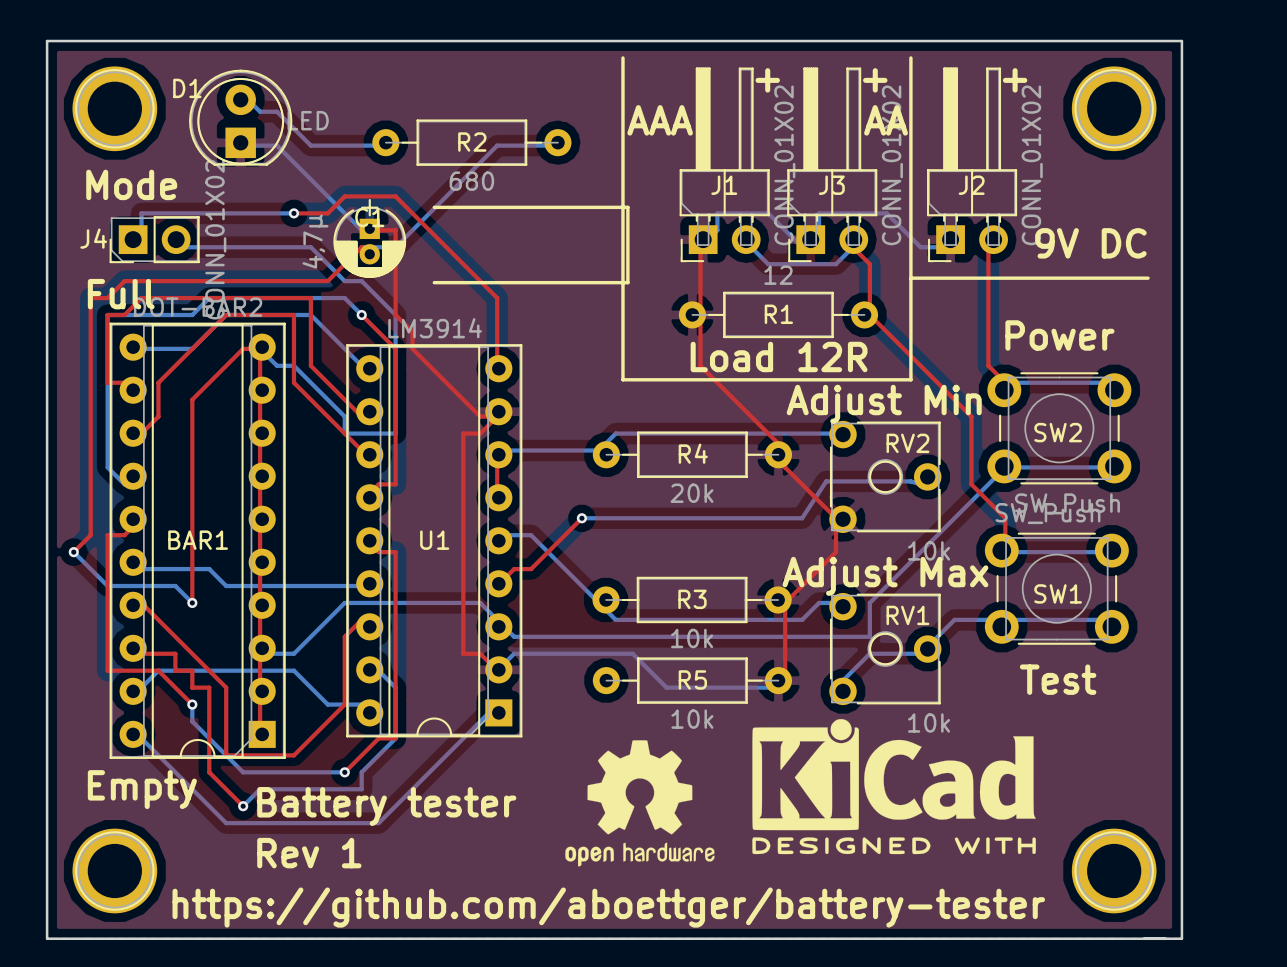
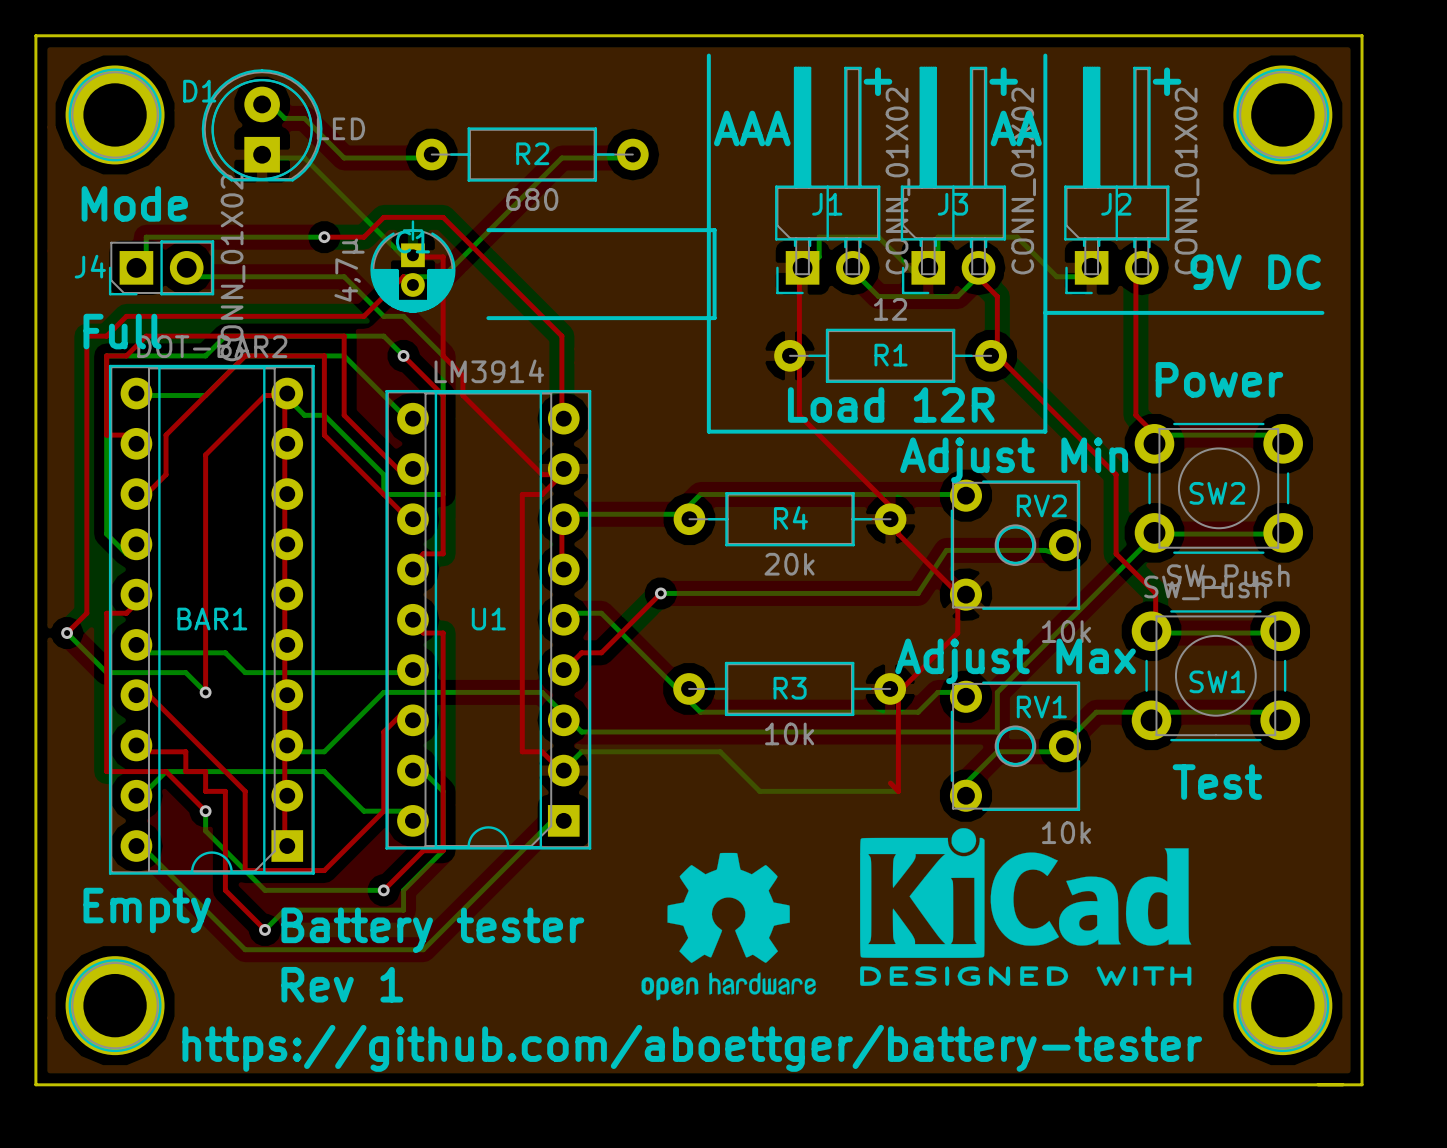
R5: 10k (692, 680) -> none

